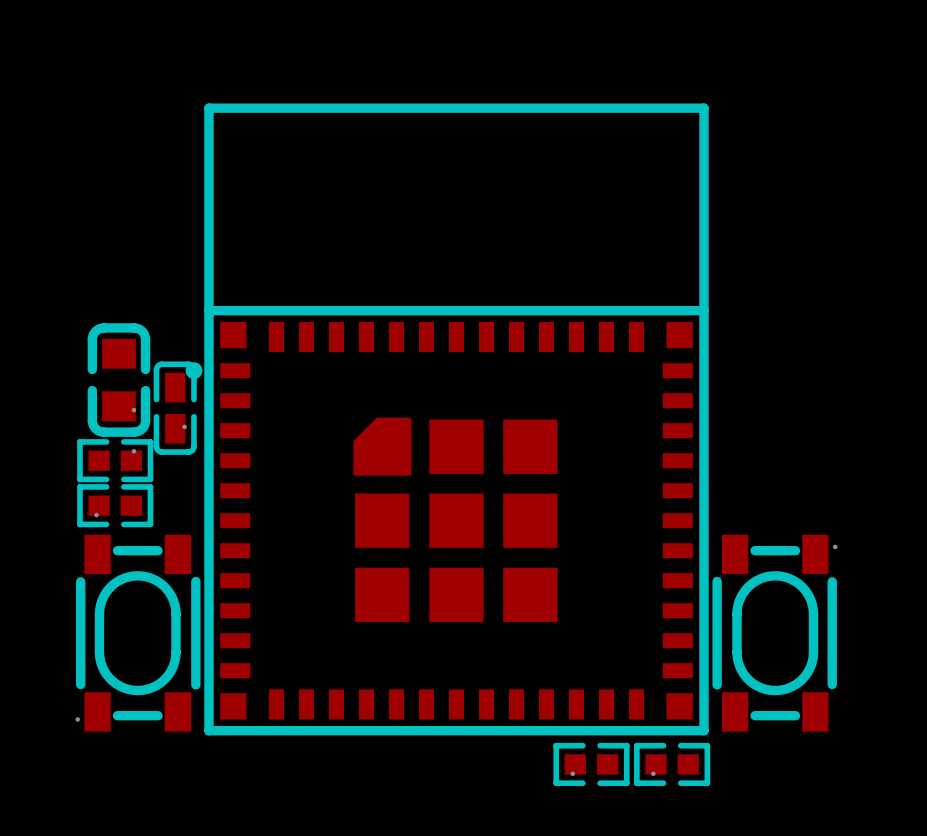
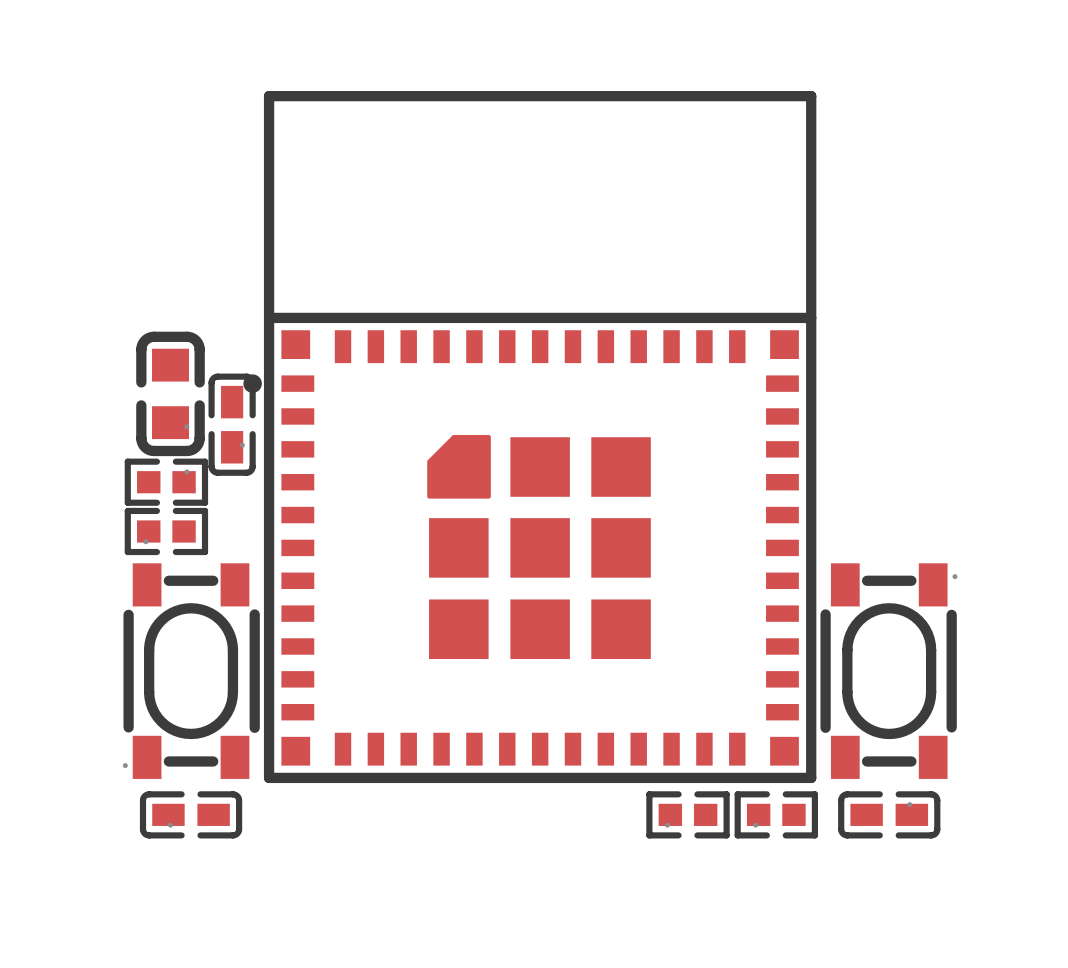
part: none -> (191, 814)
part: none -> (889, 814)

